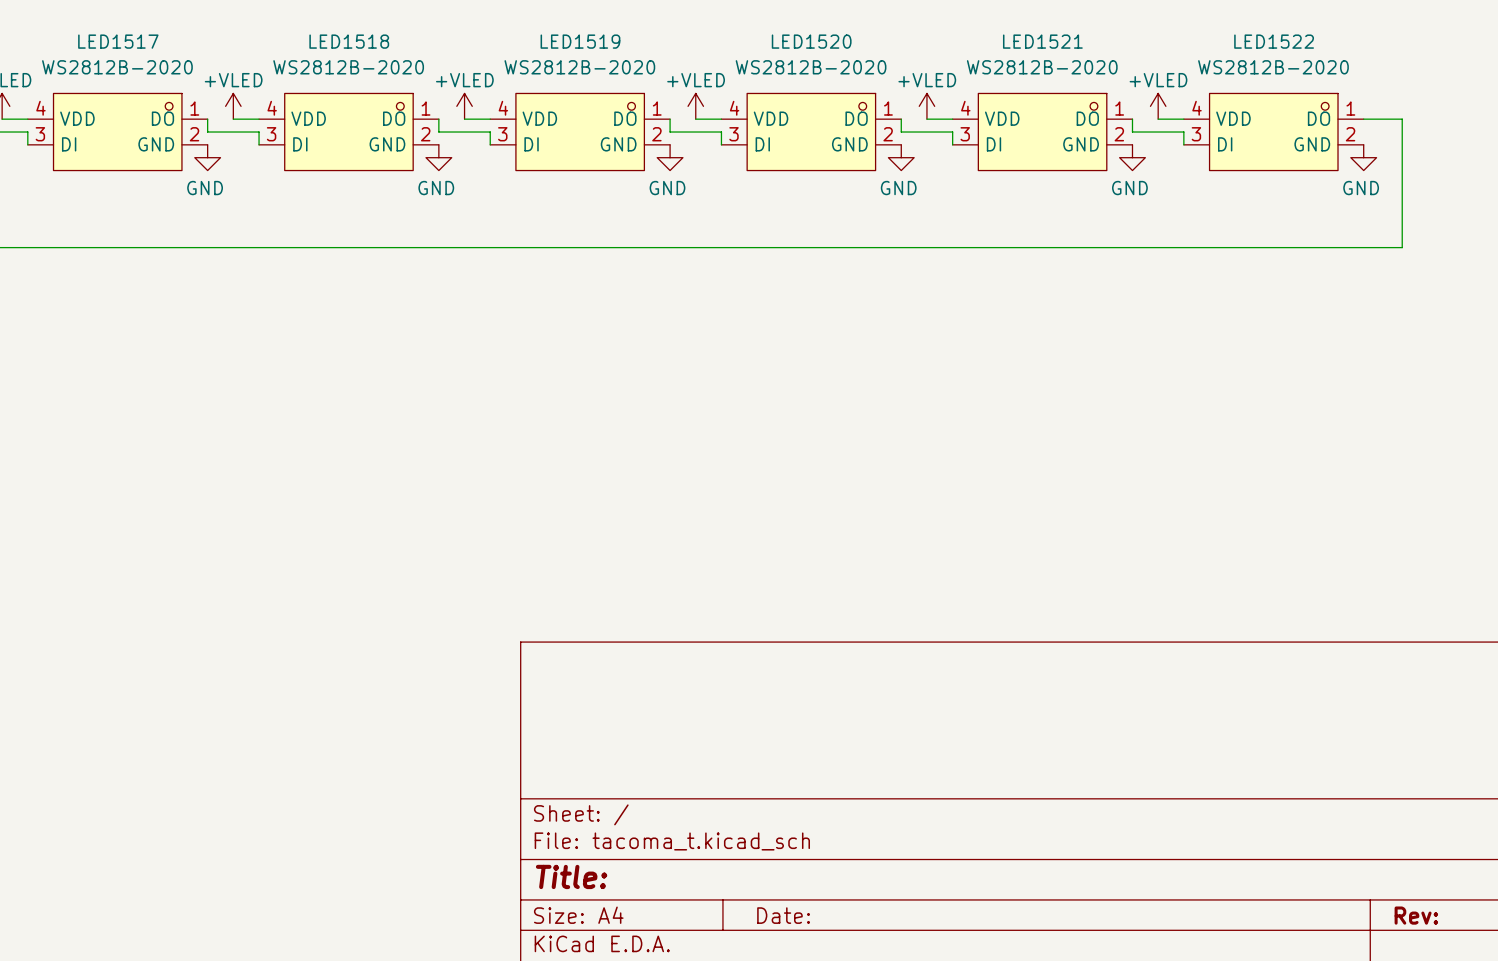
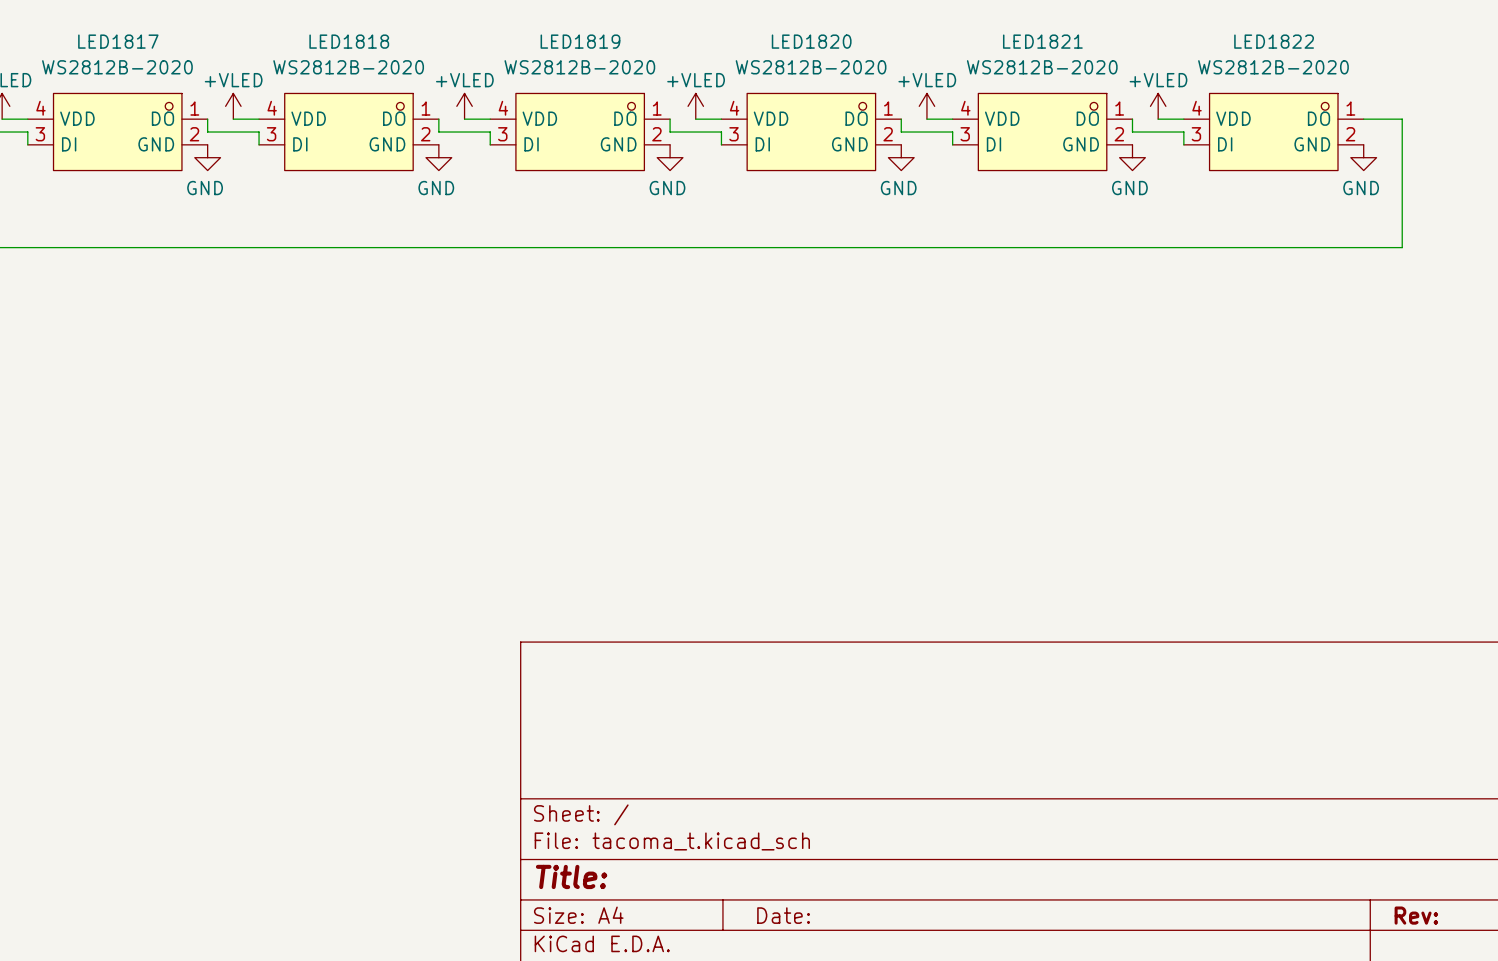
LED1517 name: LED1517 (118, 41) -> LED1817 (118, 41)
LED1518 name: LED1518 (349, 41) -> LED1818 (349, 41)
LED1519 name: LED1519 (580, 41) -> LED1819 (580, 41)
LED1520 name: LED1520 (811, 41) -> LED1820 (811, 41)
LED1521 name: LED1521 (1042, 41) -> LED1821 (1042, 41)
LED1522 name: LED1522 (1274, 41) -> LED1822 (1274, 41)

